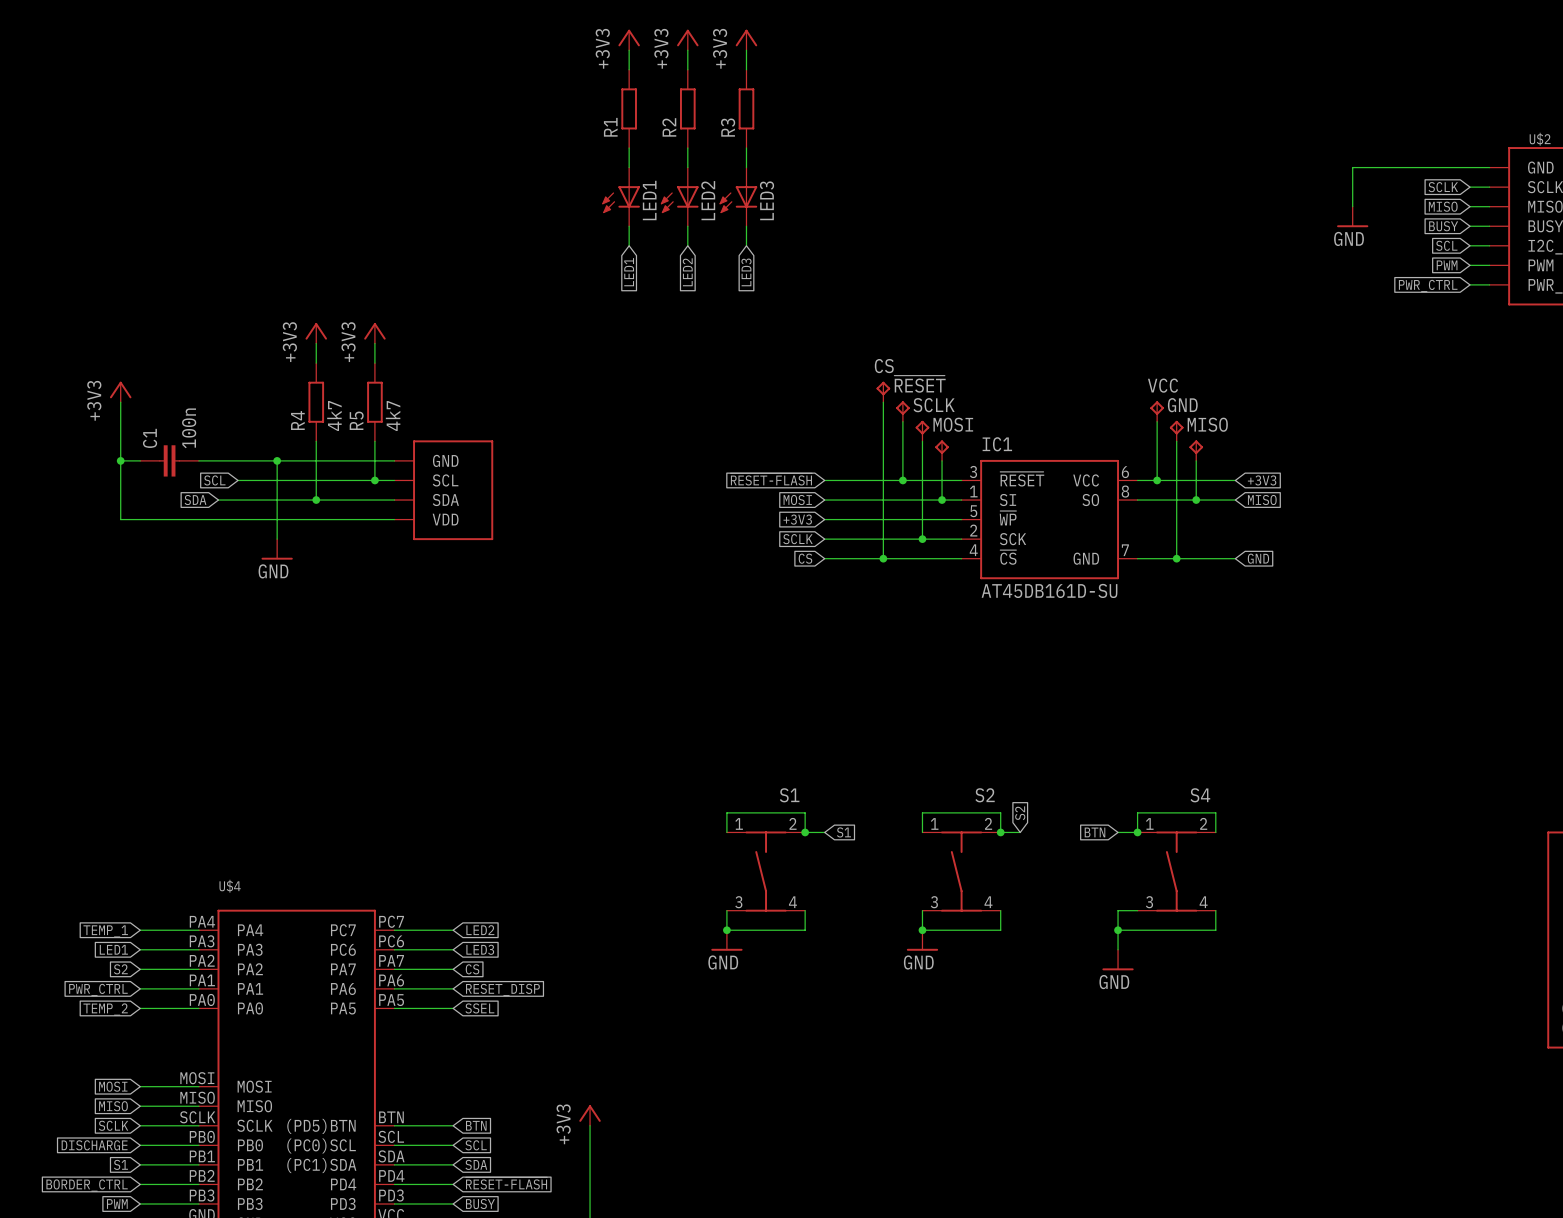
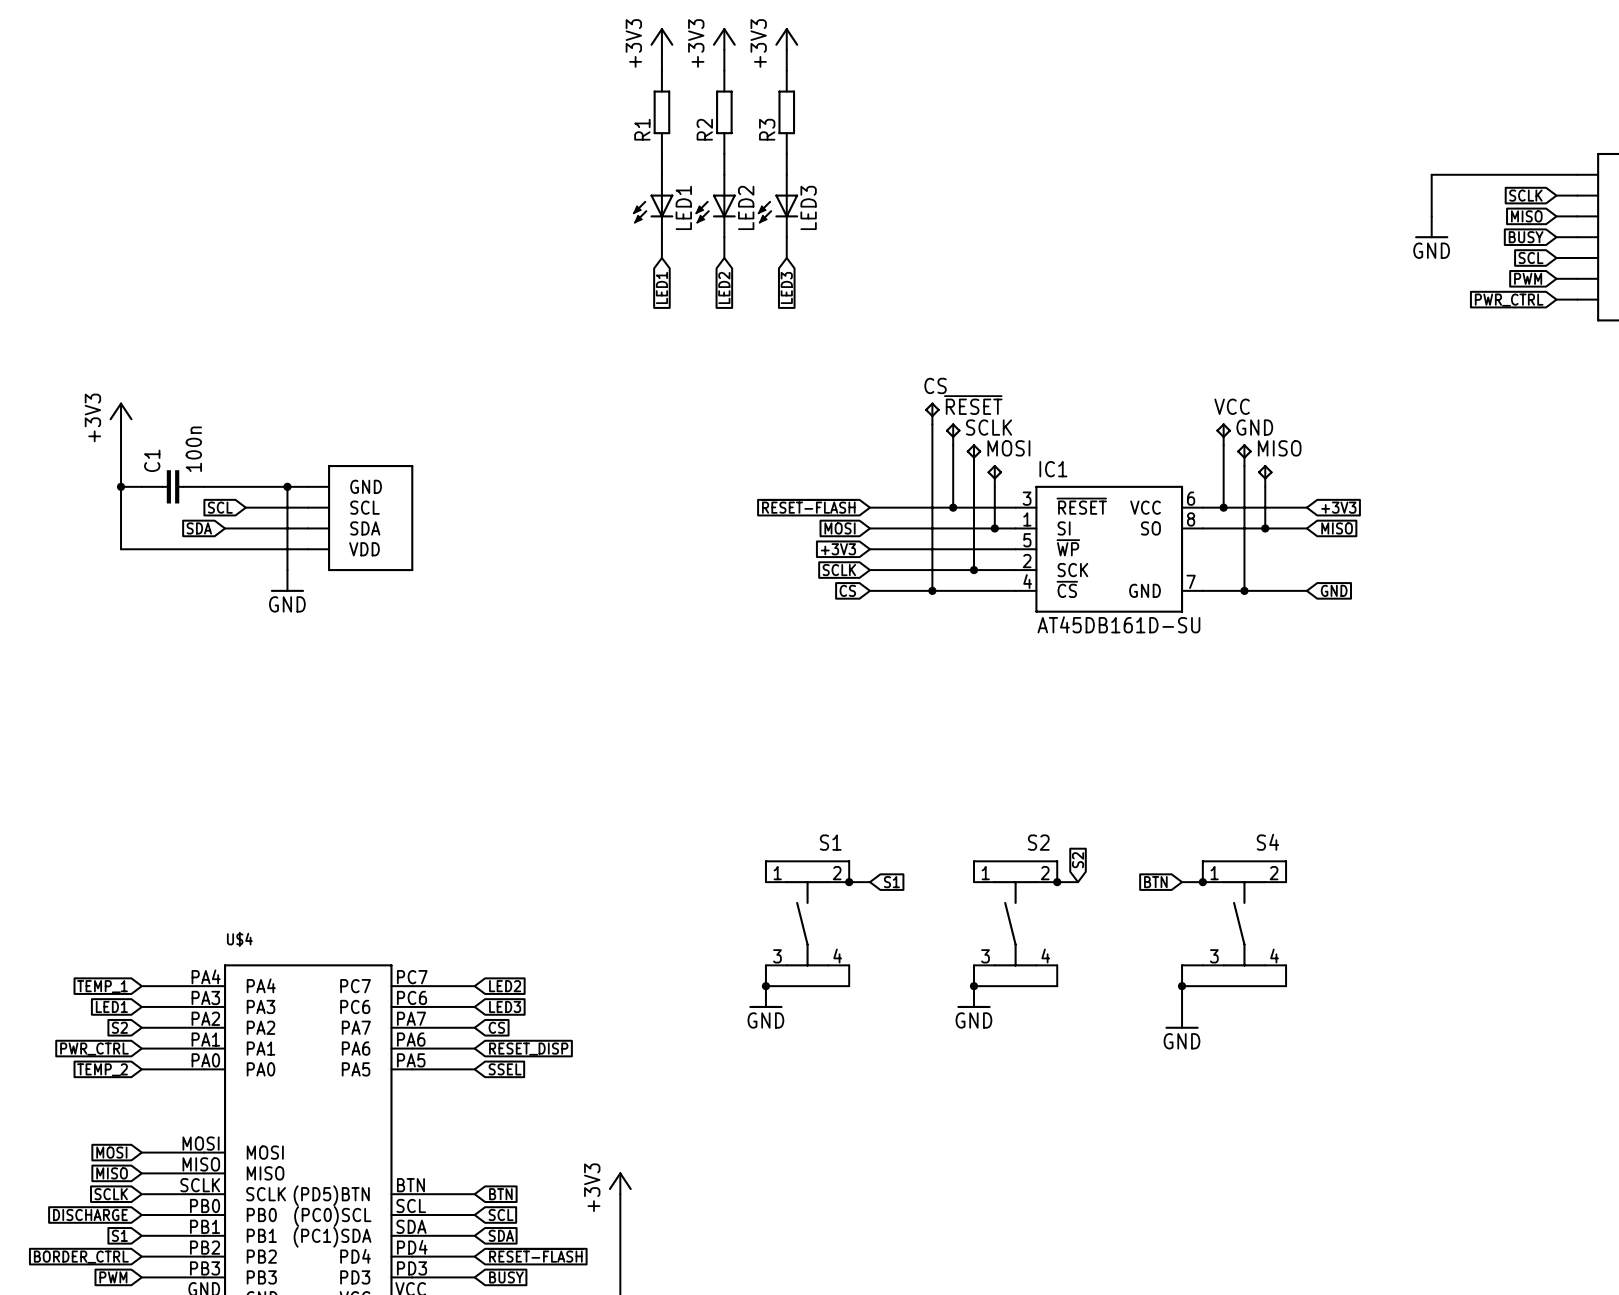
power symbol: +3V3 (316, 333) -> none
power symbol: +3V3 (374, 333) -> none
wire: (316, 343) (316, 363) -> none
wire: (374, 343) (374, 363) -> none
R4: 4k7 (316, 402) -> none
R5: 4k7 (374, 402) -> none
wire: (374, 441) (374, 480) -> none
wire: (296, 460) (394, 460) -> none
wire: (296, 480) (394, 480) -> none
junction: (374, 480) -> none
part position: (443, 490) -> (360, 518)
wire: (296, 500) (394, 500) -> none
junction: (316, 500) -> none
wire: (296, 519) (394, 519) -> none

